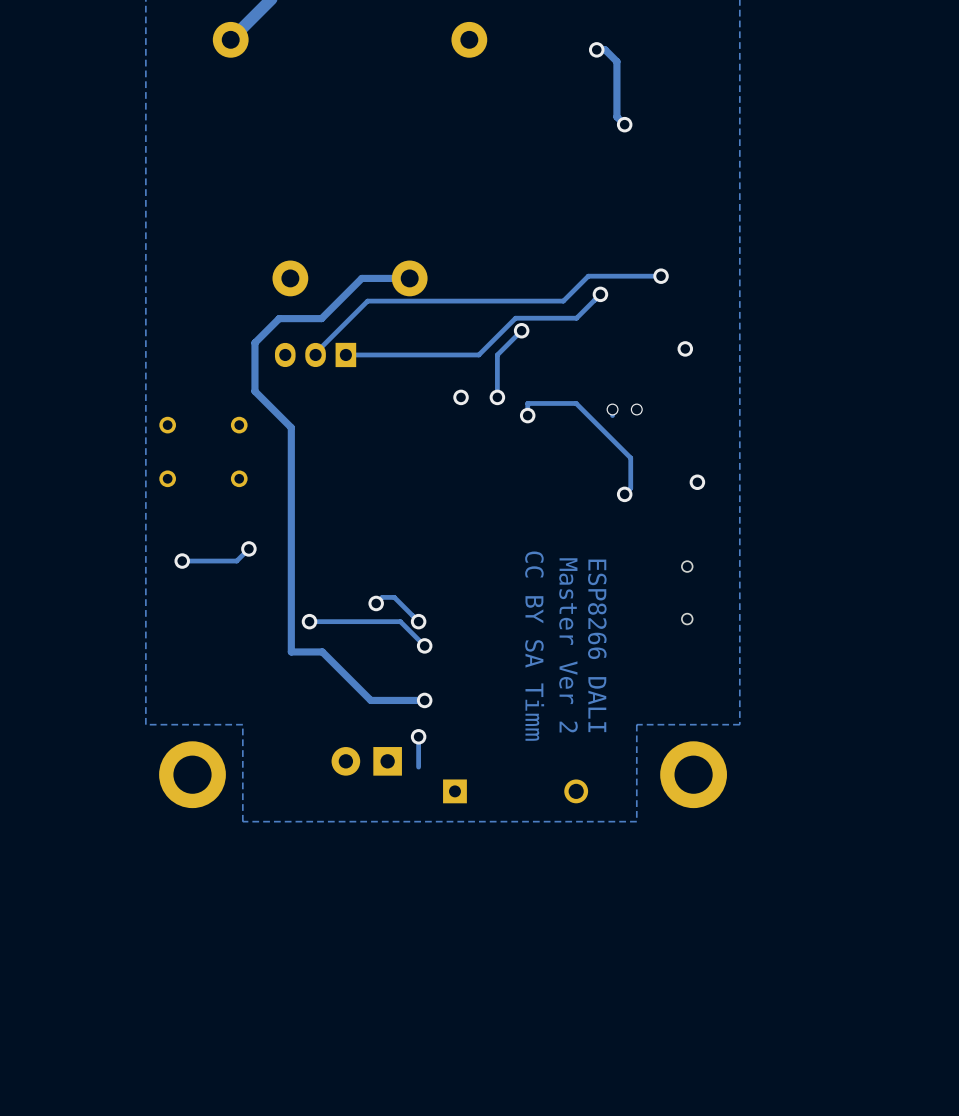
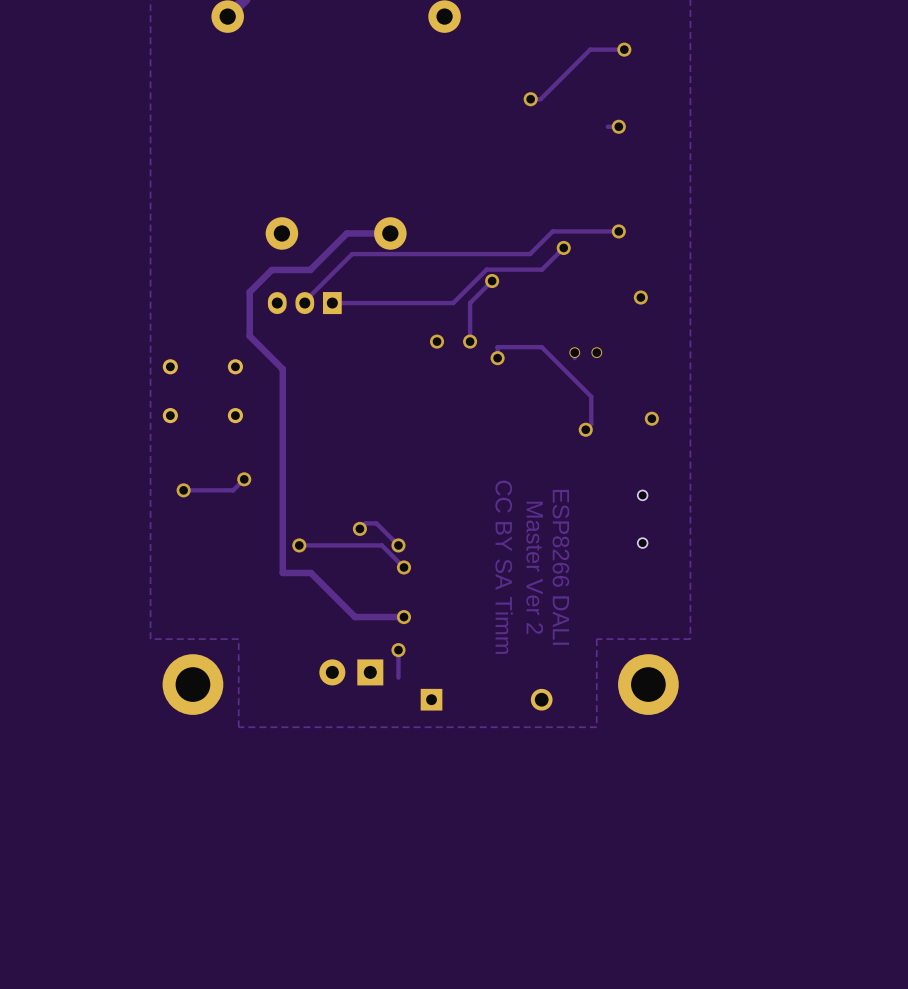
track: (596, 49) (605, 49) (616, 61) (616, 116) (624, 124) -> none
via: (596, 49) -> none
track: none -> (624, 49) (590, 49) (540, 99) (530, 99)
via: none -> (624, 49)
via: (624, 124) -> none
via: none -> (530, 99)
track: none -> (618, 126) (607, 126)
via: none -> (618, 126)

